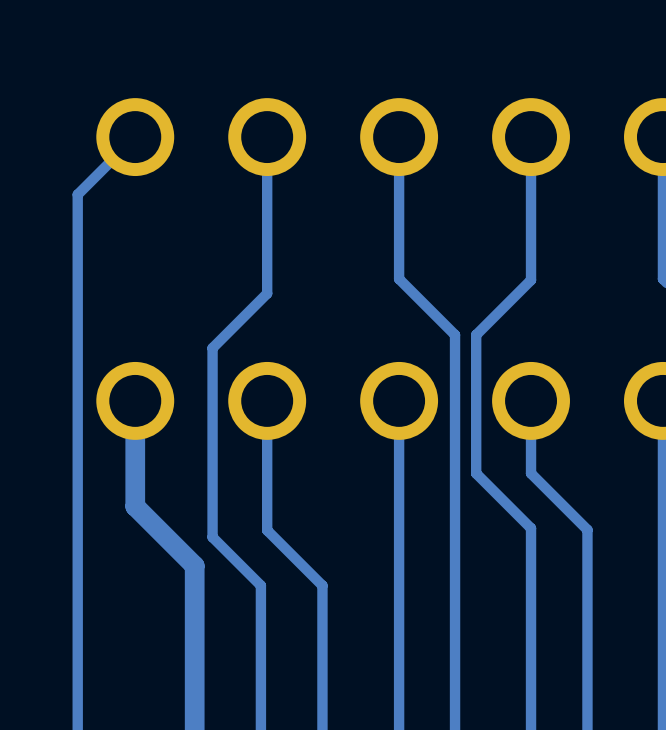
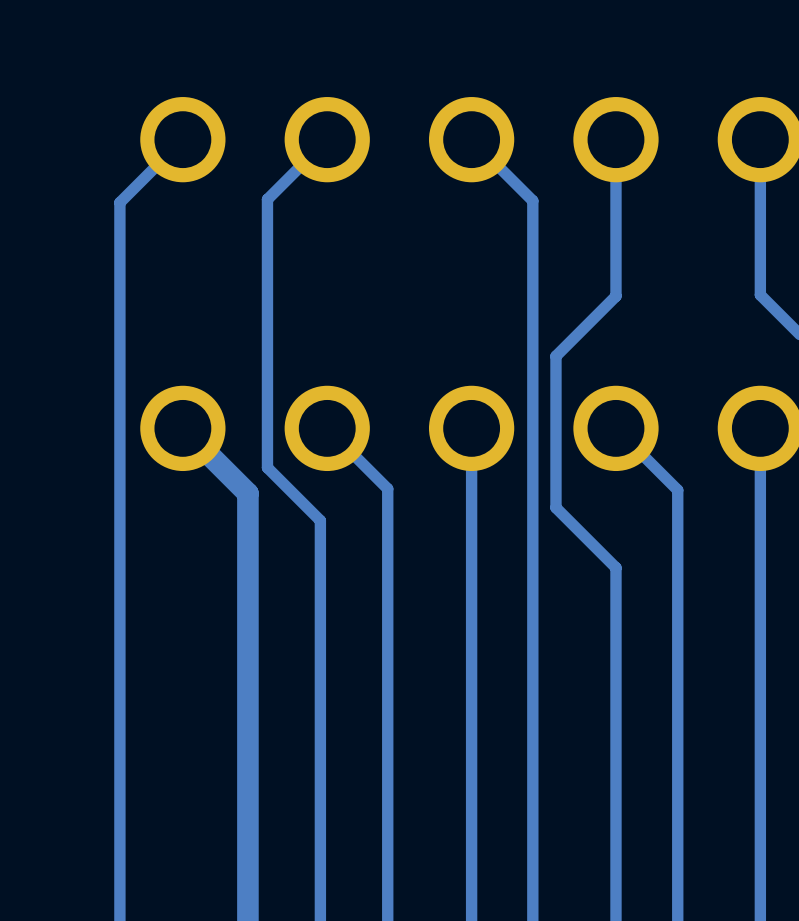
track: (267, 137) (267, 293) (212, 348) -> (327, 139) (267, 199) (267, 370)
track: (399, 137) (399, 279) (455, 334) -> (471, 139) (532, 200) (532, 356)
track: (135, 400) (135, 506) (194, 565) -> (182, 428) (247, 493) (247, 608)
track: (267, 400) (267, 530) (322, 585) -> (327, 428) (387, 488) (387, 630)
track: (531, 400) (531, 473) (587, 529) -> (615, 428) (677, 490) (677, 569)
track: (212, 436) (212, 537) (260, 585) -> (267, 467) (320, 520) (320, 630)

